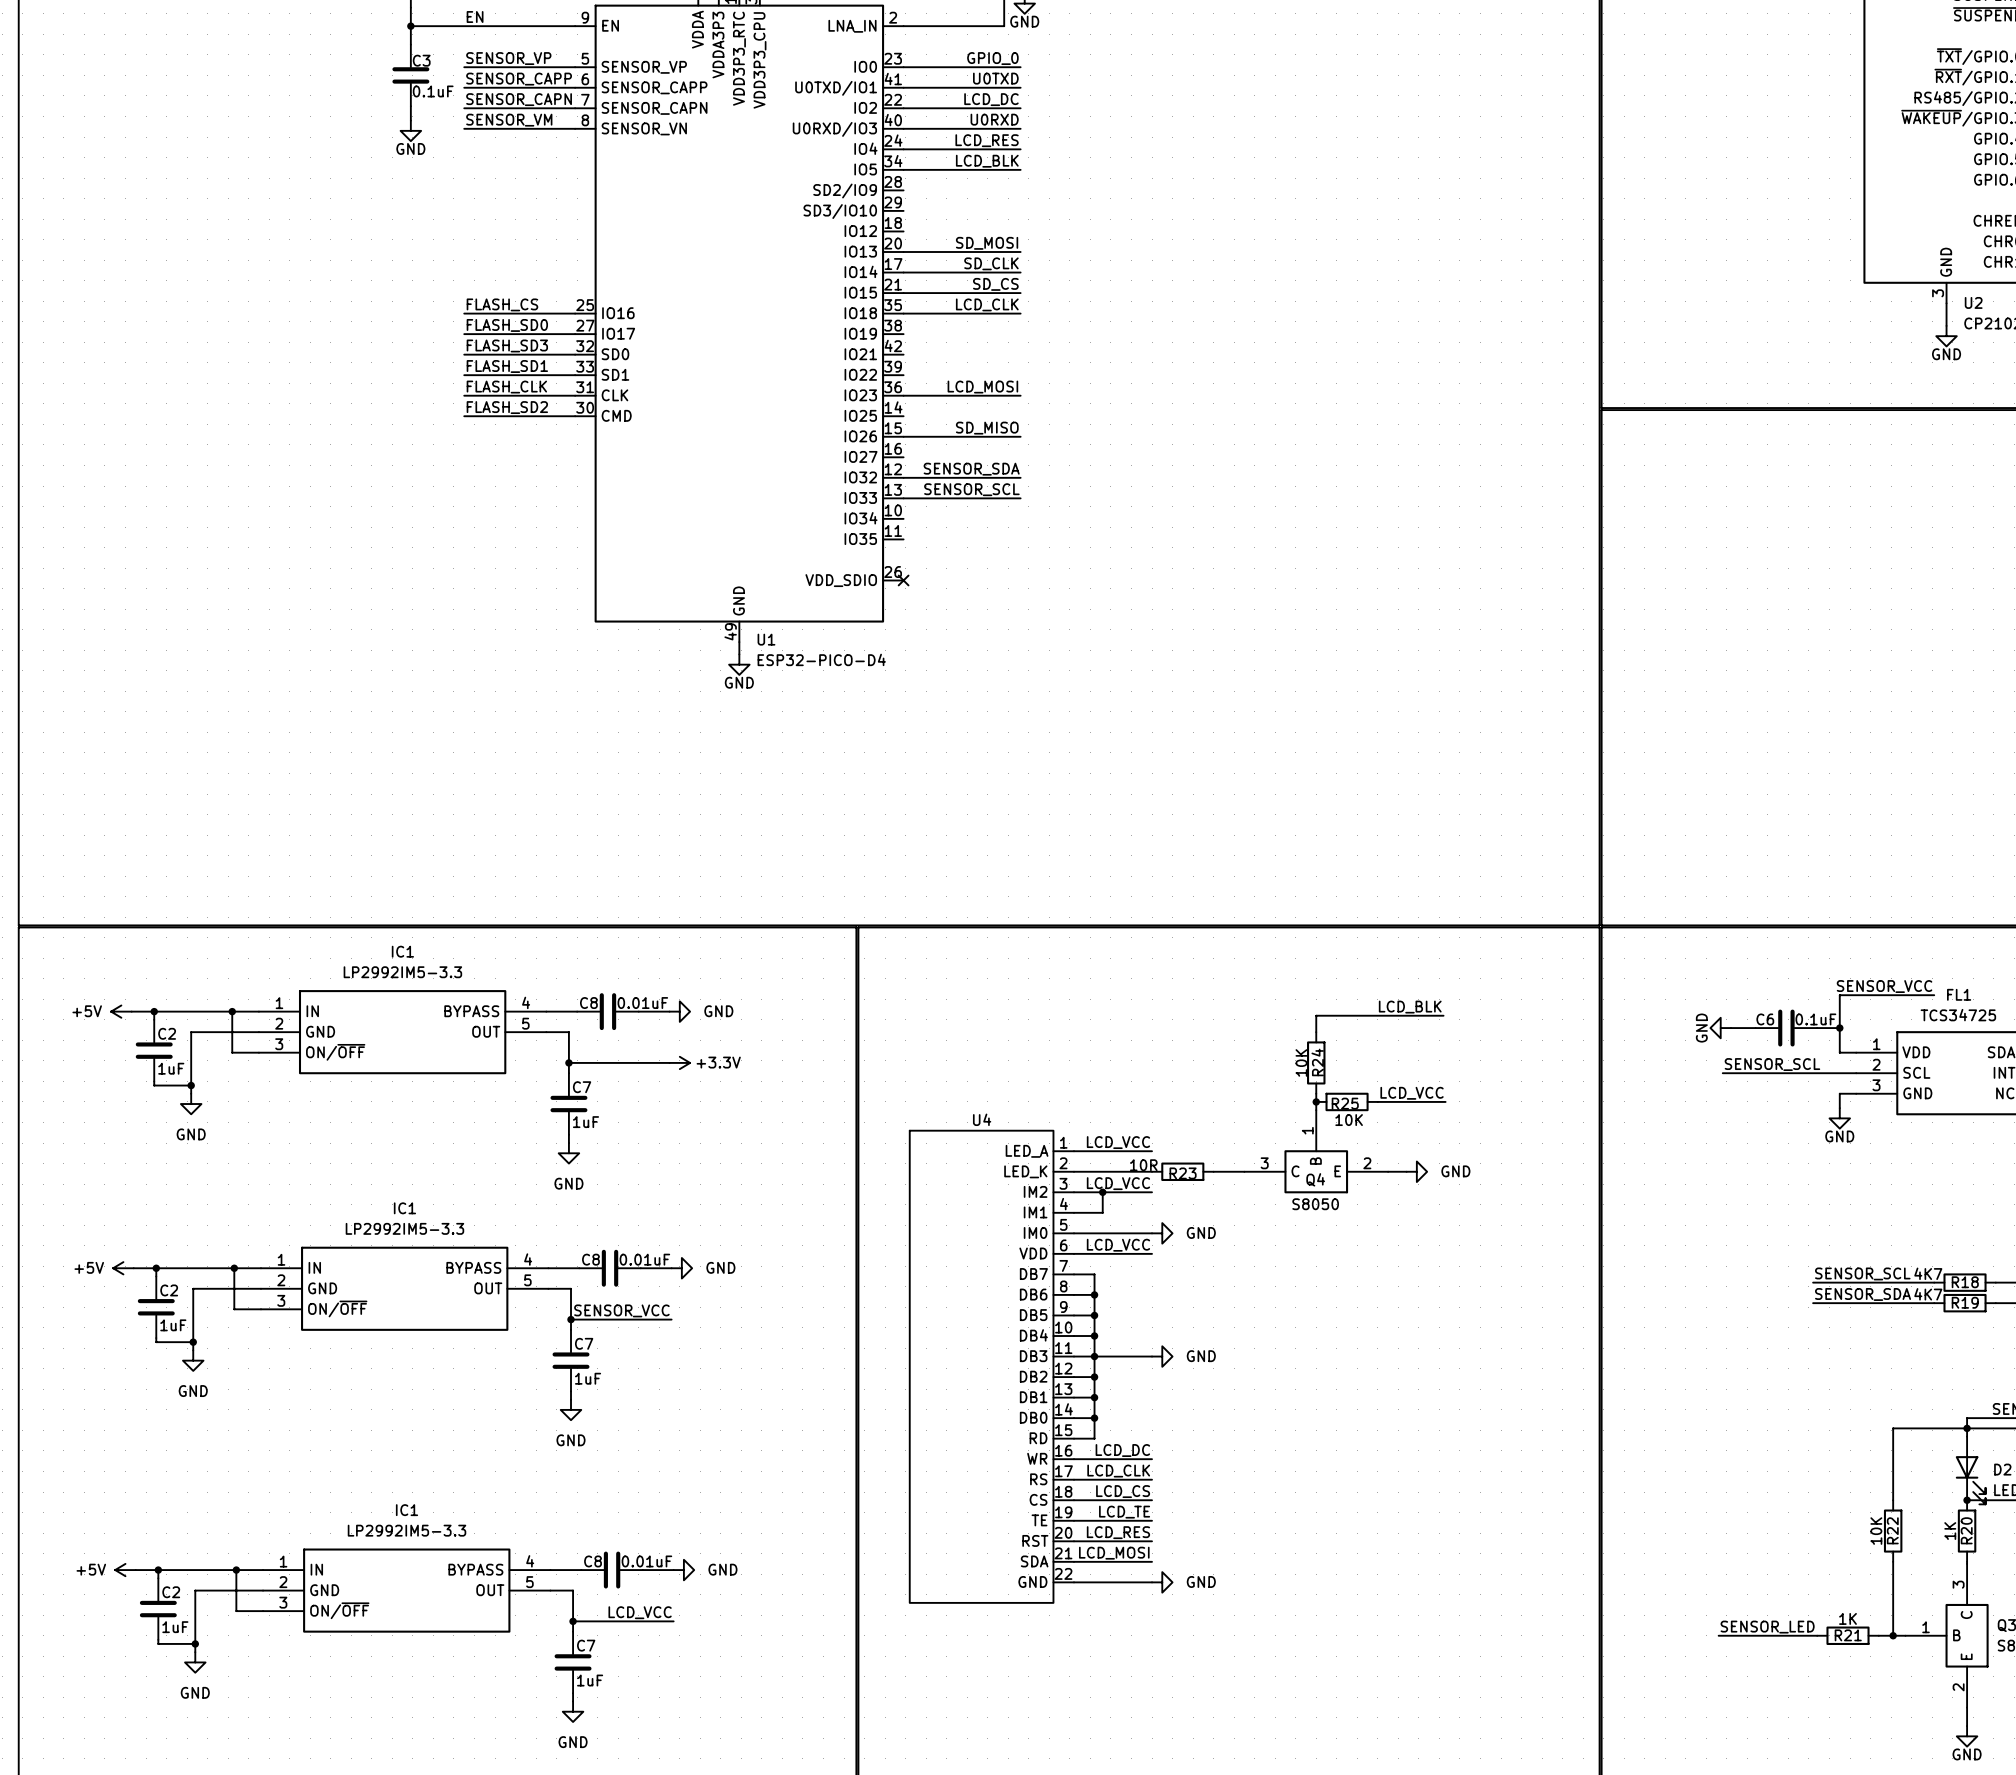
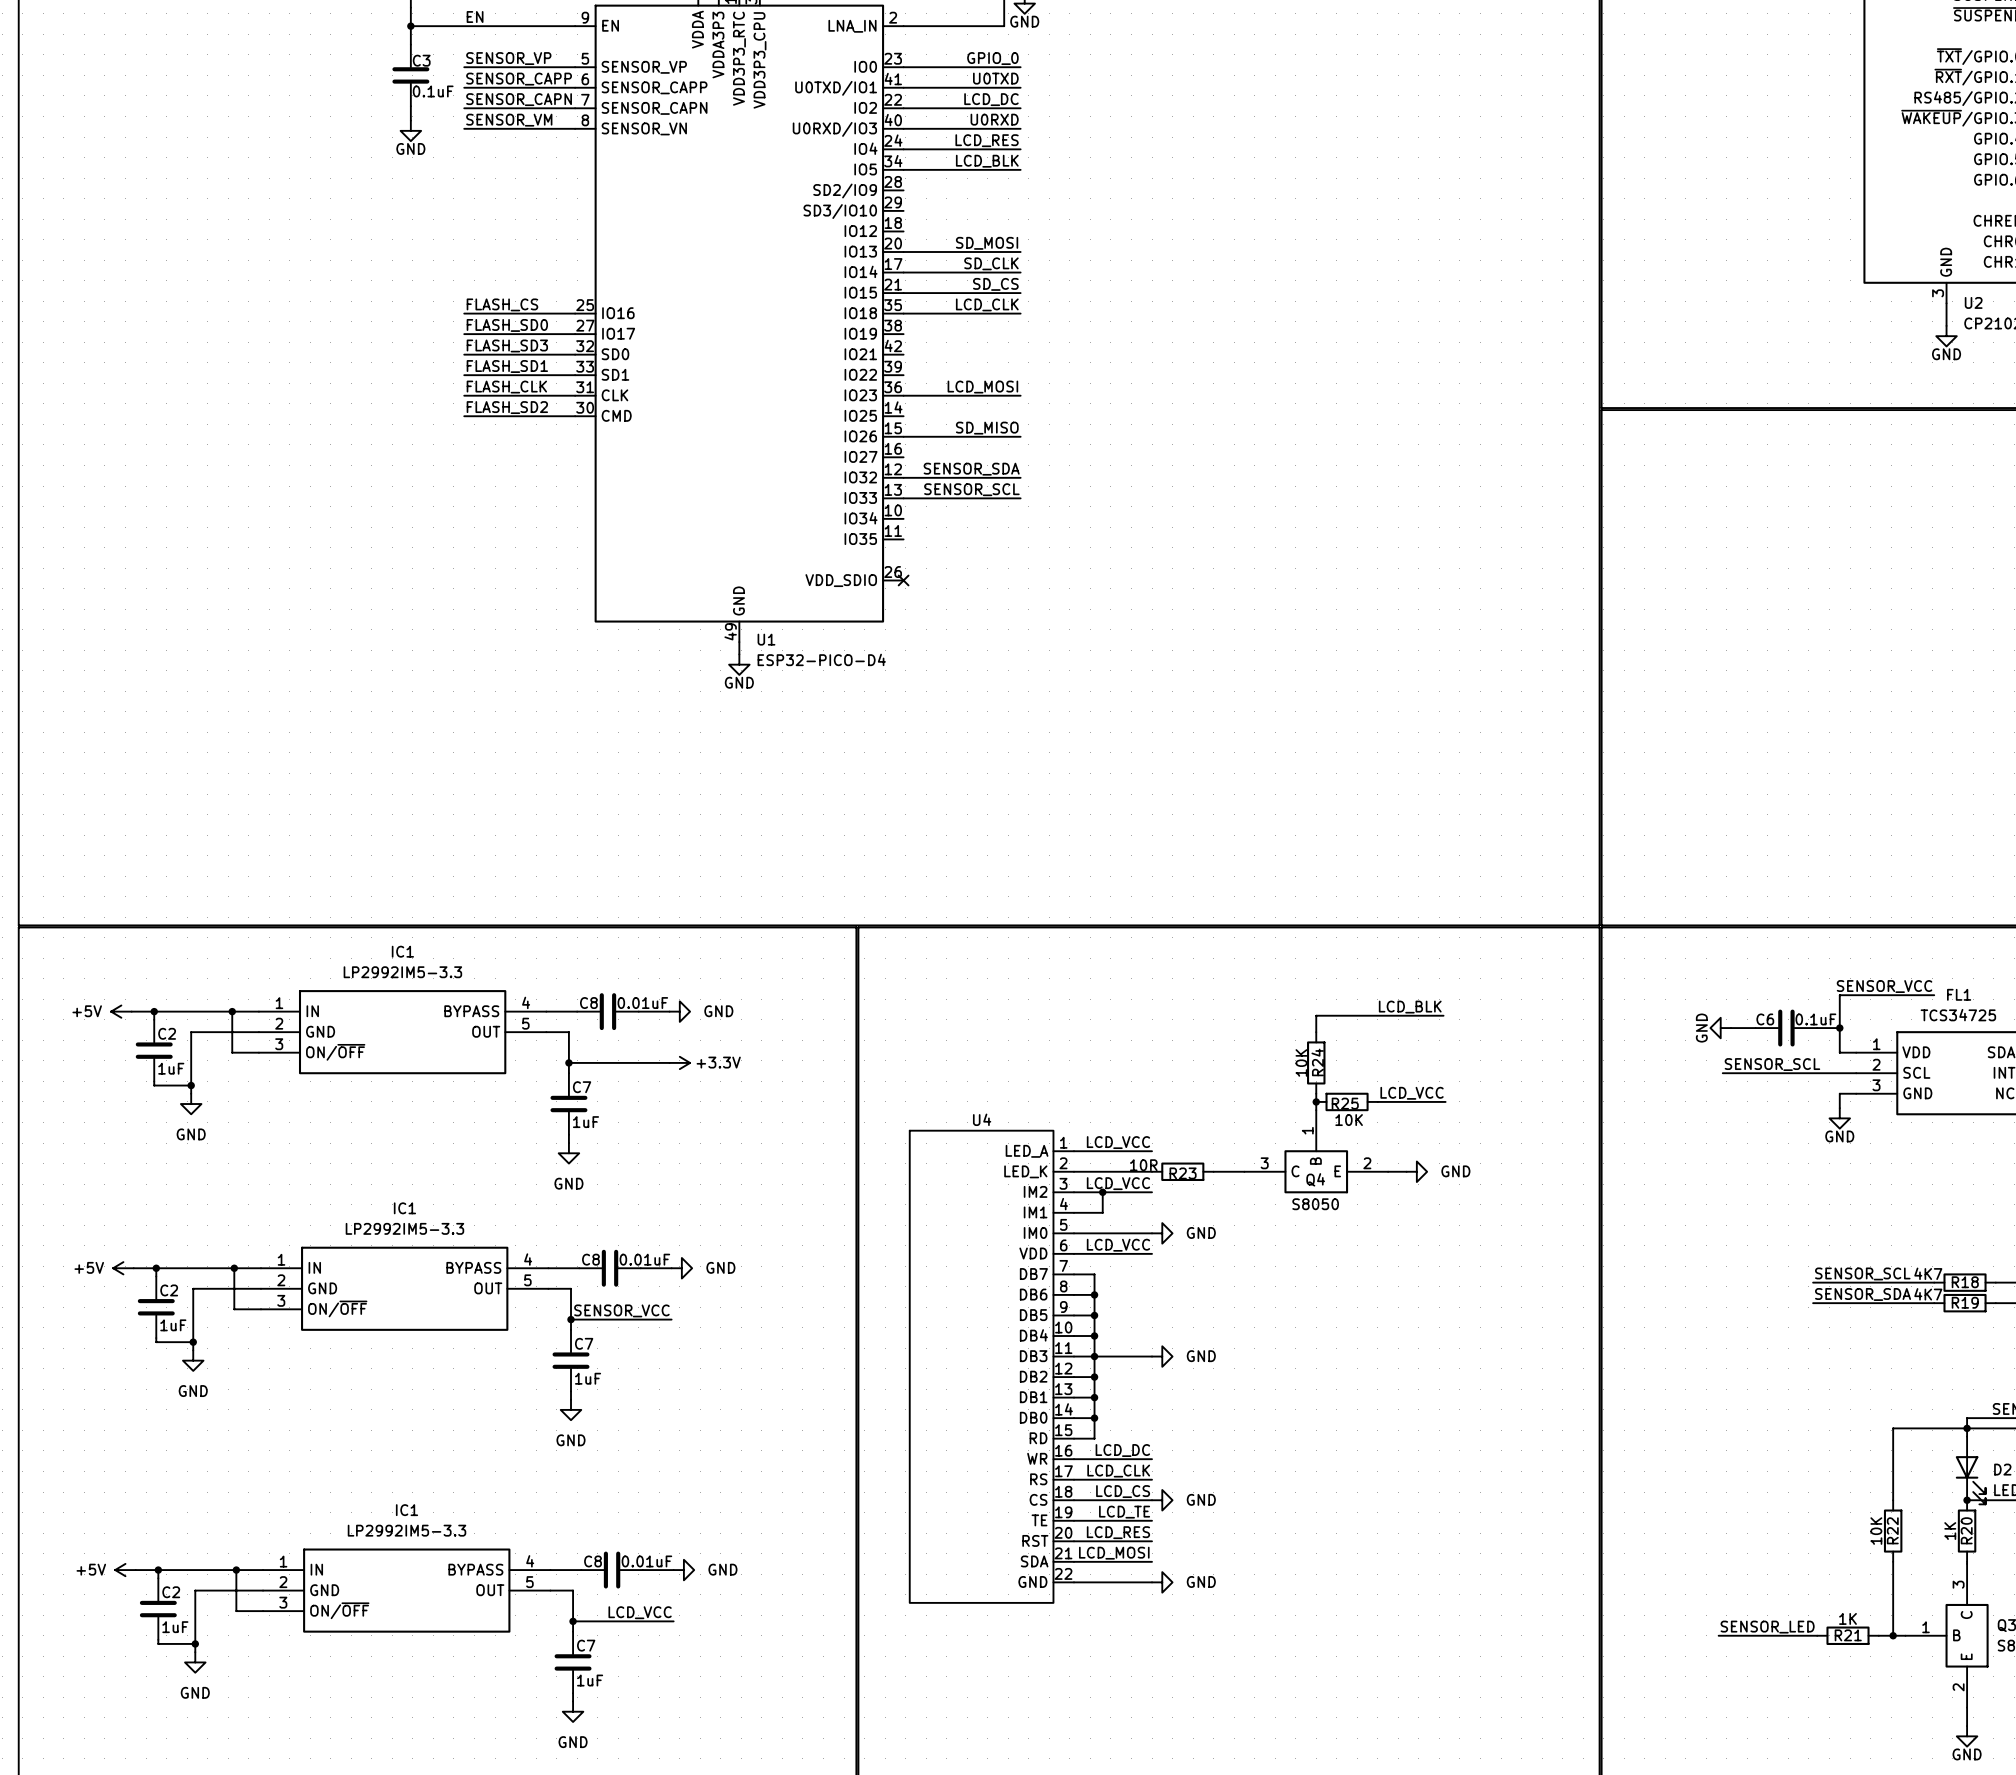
power symbol: none -> GND (1162, 1500)

